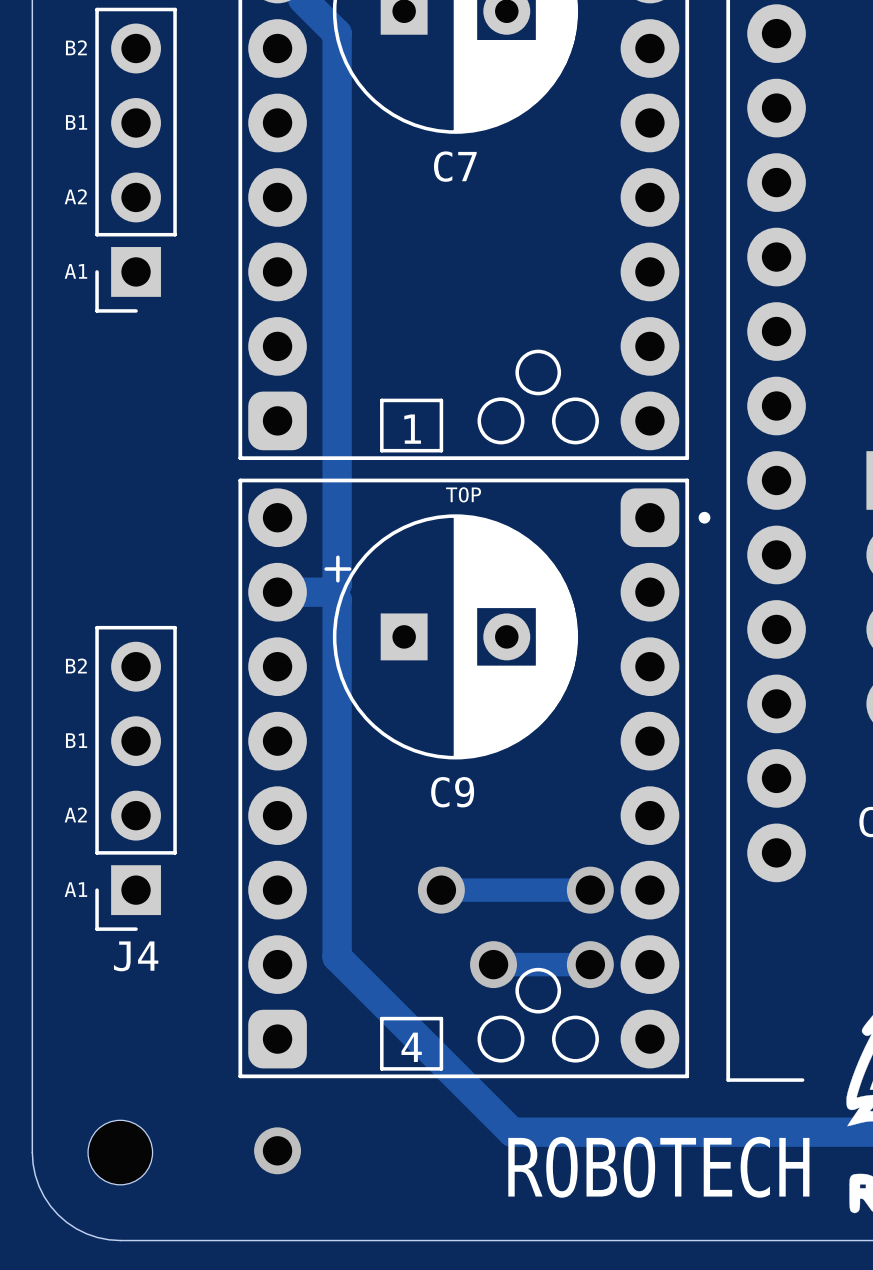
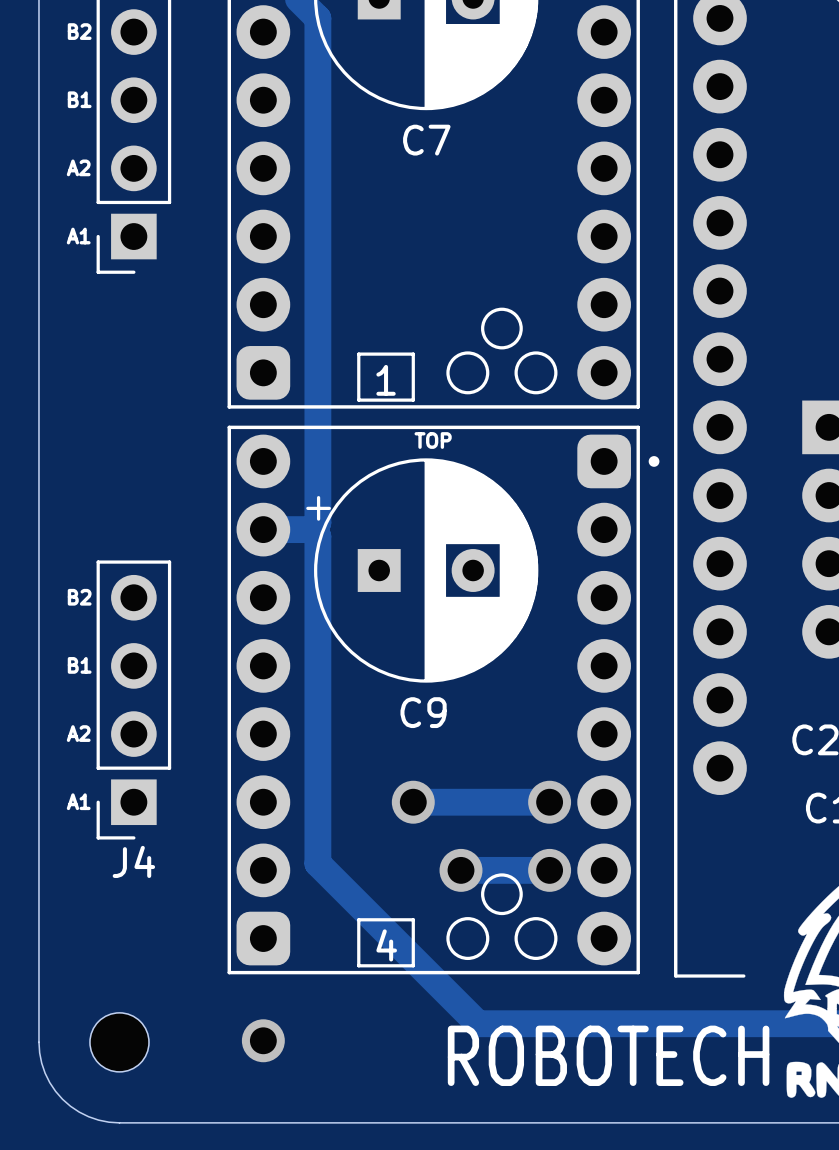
track width: thin (441, 890) (590, 890) -> thick (413, 802) (549, 802)
track width: thin (493, 964) (590, 964) -> thick (461, 870) (549, 870)

